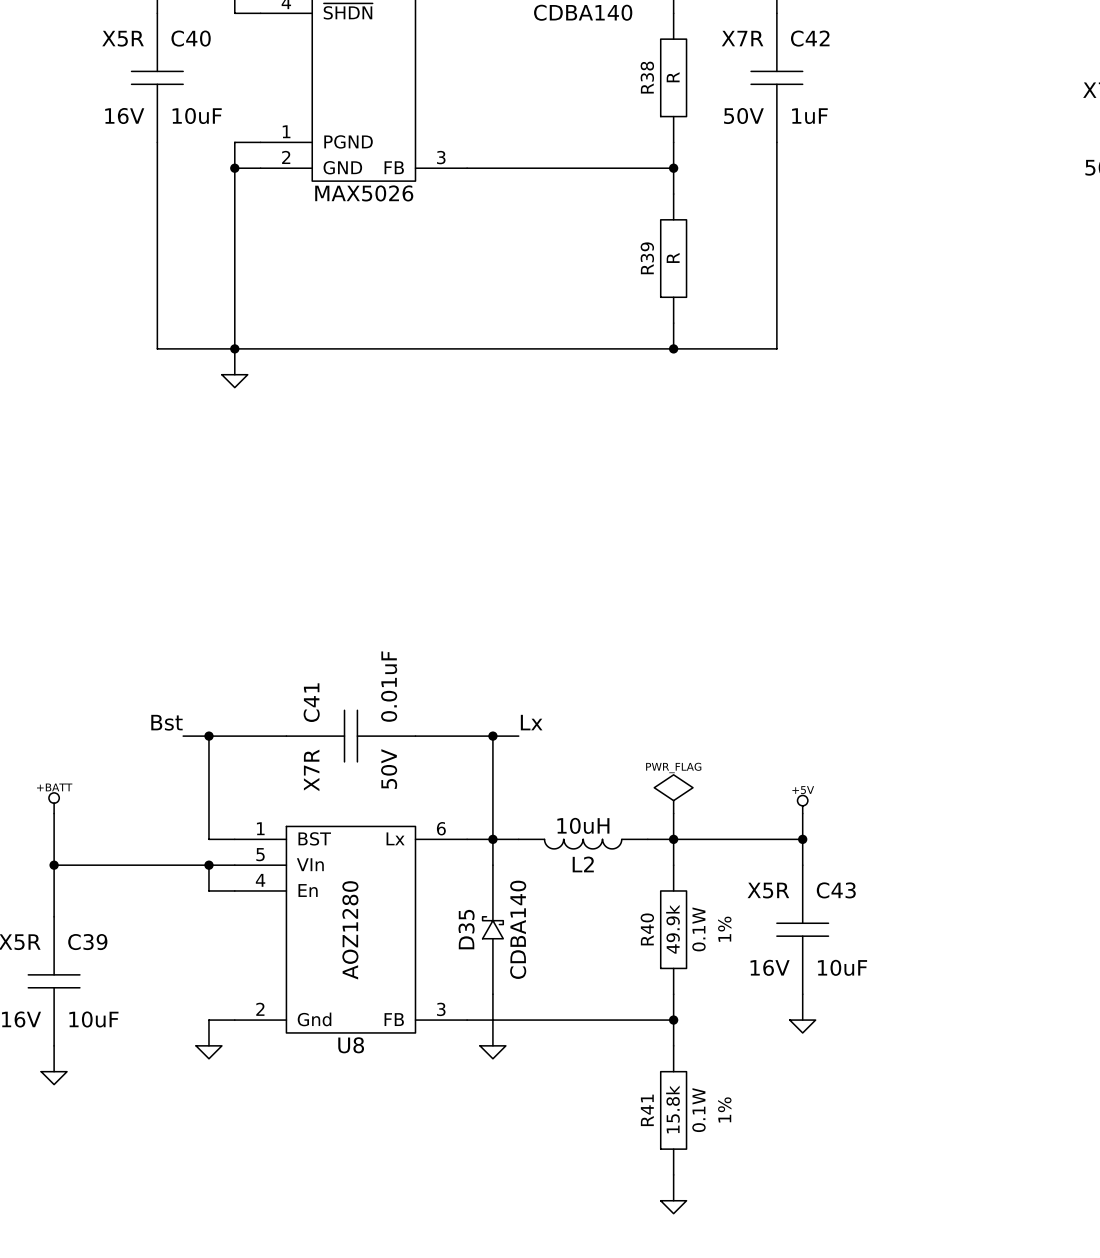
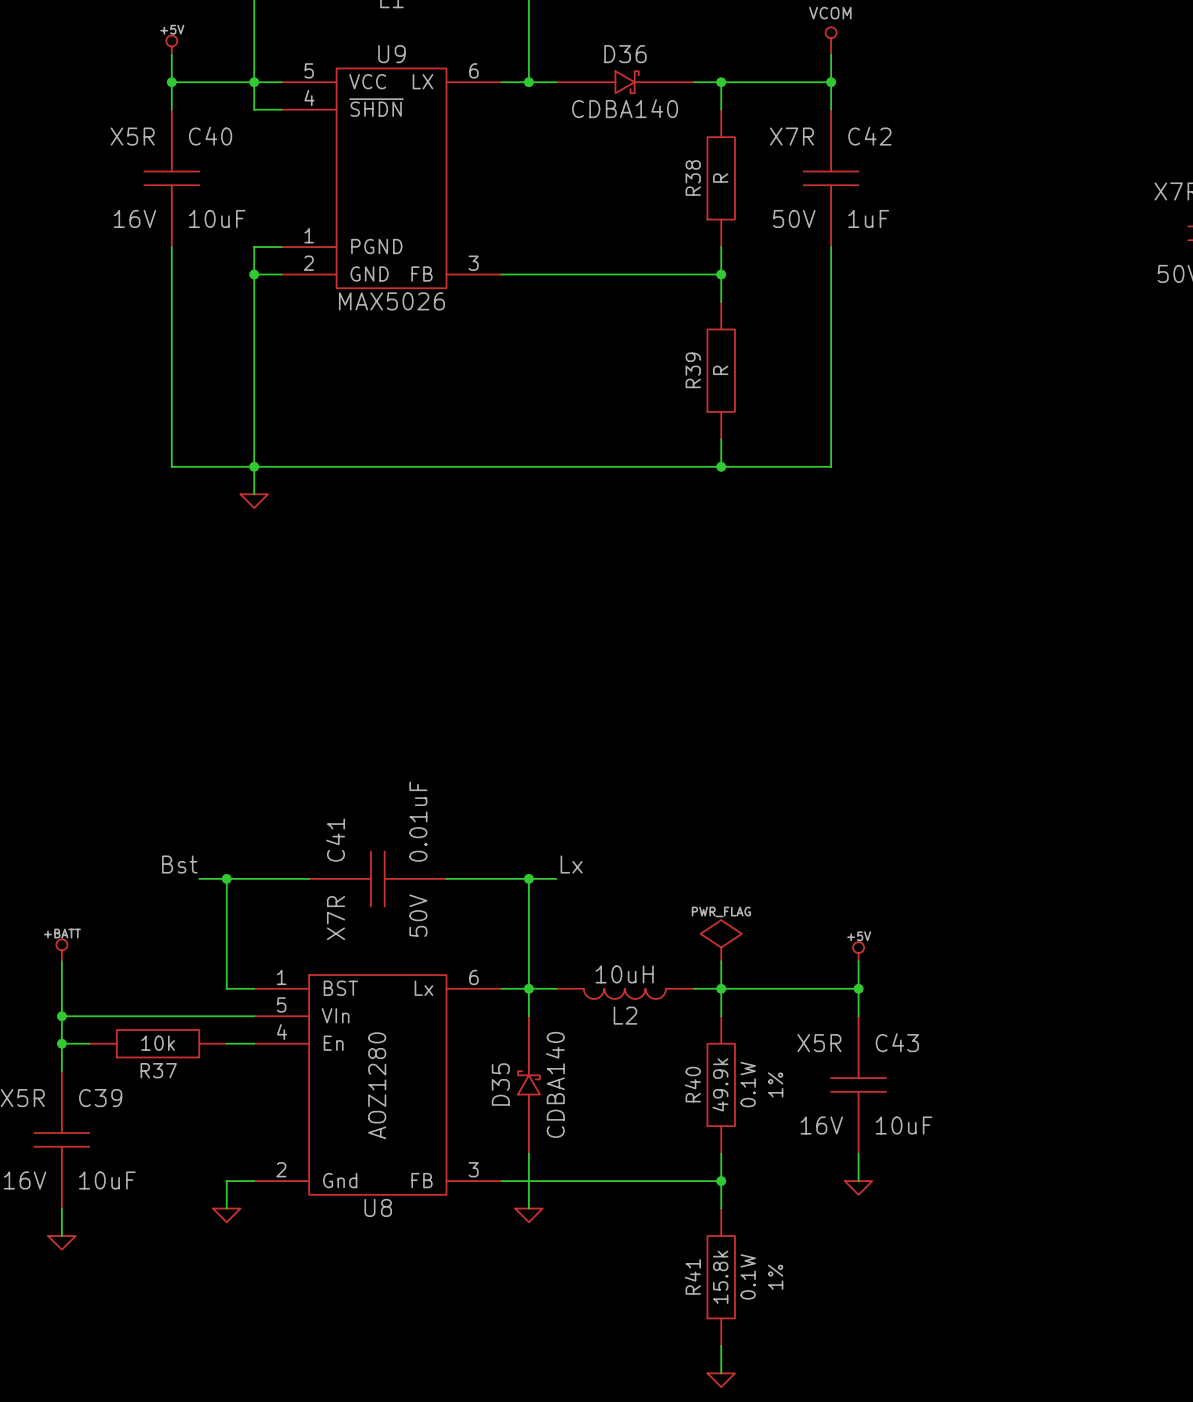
wire: (208, 865) (208, 890) -> none
junction: (208, 865) -> none
wire: none -> (61, 1043) (89, 1043)
junction: none -> (61, 1043)
R37: none -> 10k (158, 1043)

